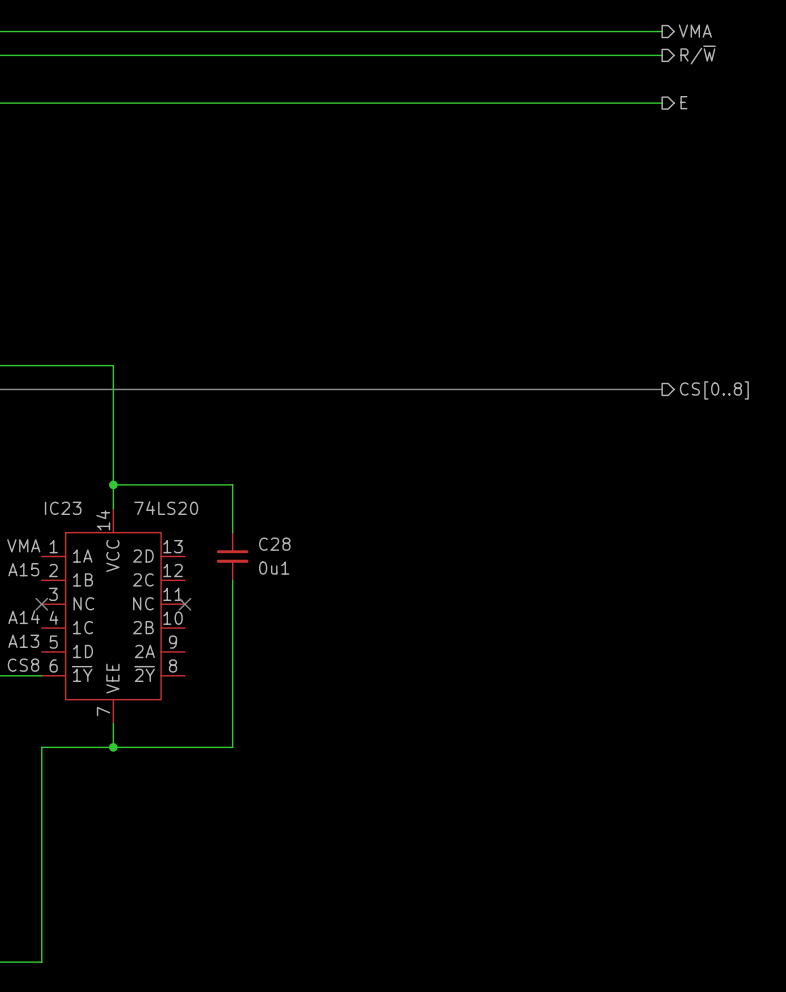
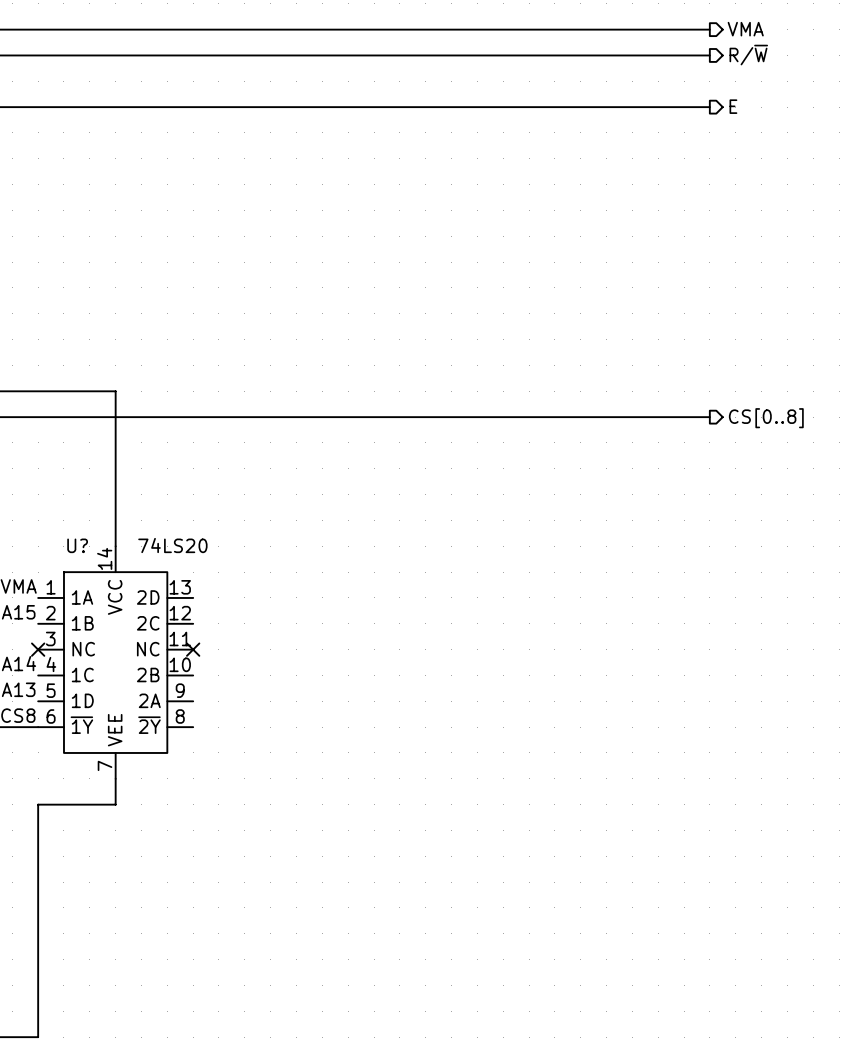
wire: (113, 484) (232, 484) (232, 532) -> none
junction: (113, 484) -> none
IC23 name: IC23 (63, 508) -> U? (77, 545)
C28: 0u1 (232, 556) -> none
wire: (232, 580) (232, 747) (113, 747) -> none
junction: (113, 747) -> none

